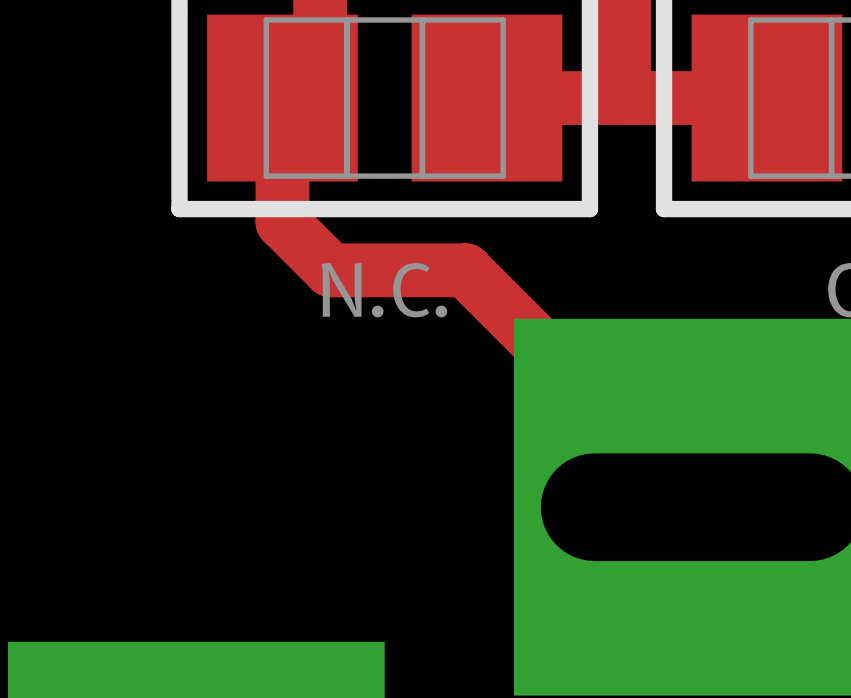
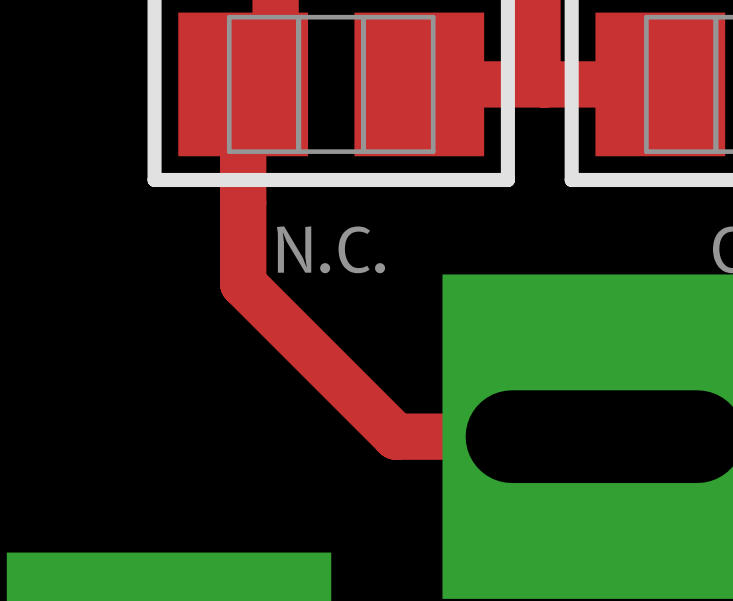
top track: (282, 221) (330, 270) (465, 270) (702, 507) -> (243, 191) (243, 283) (396, 436) (604, 436)

